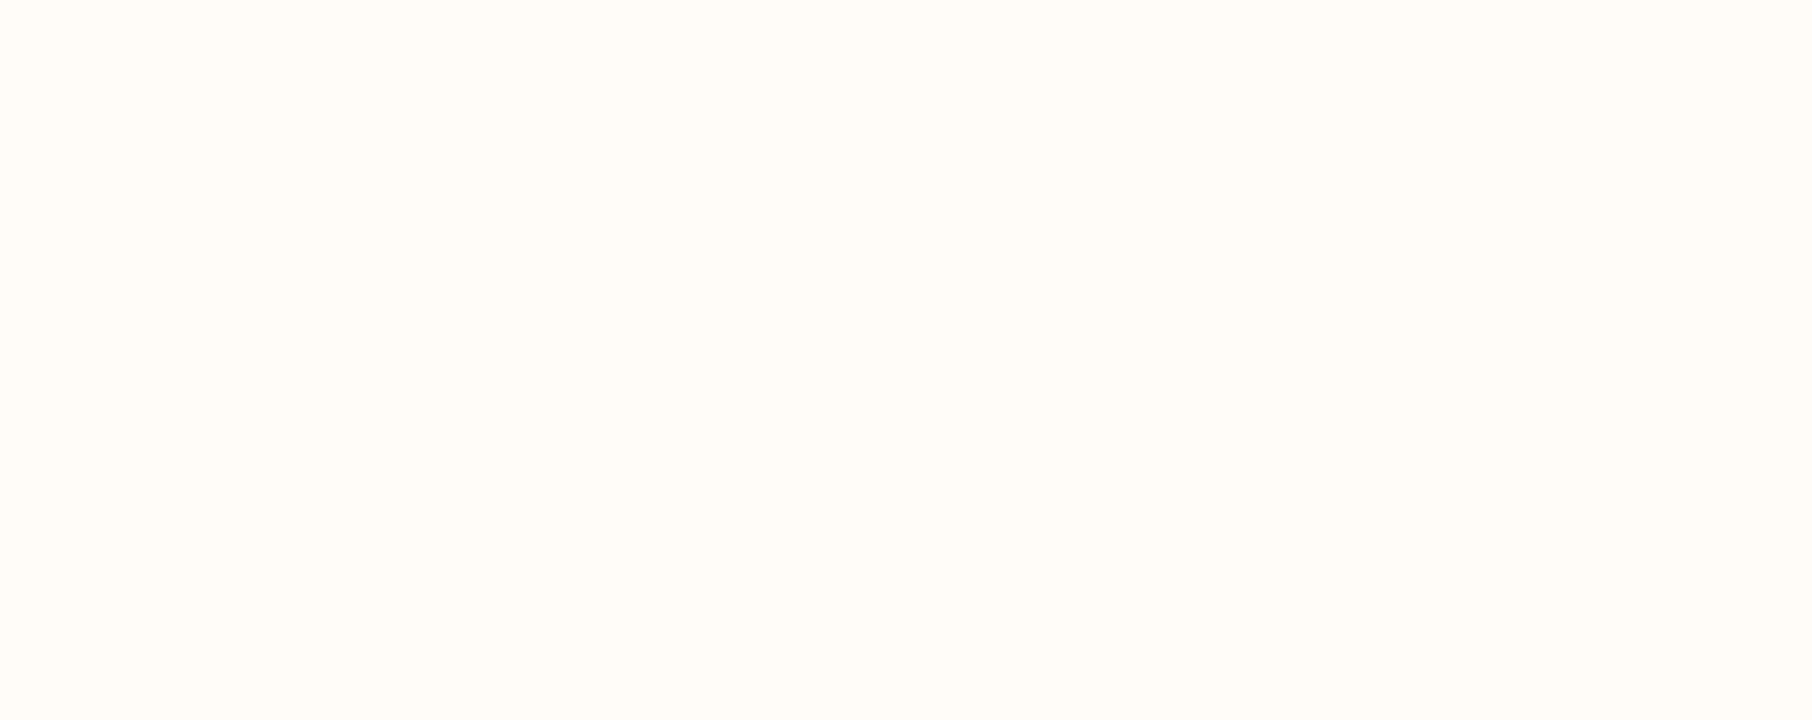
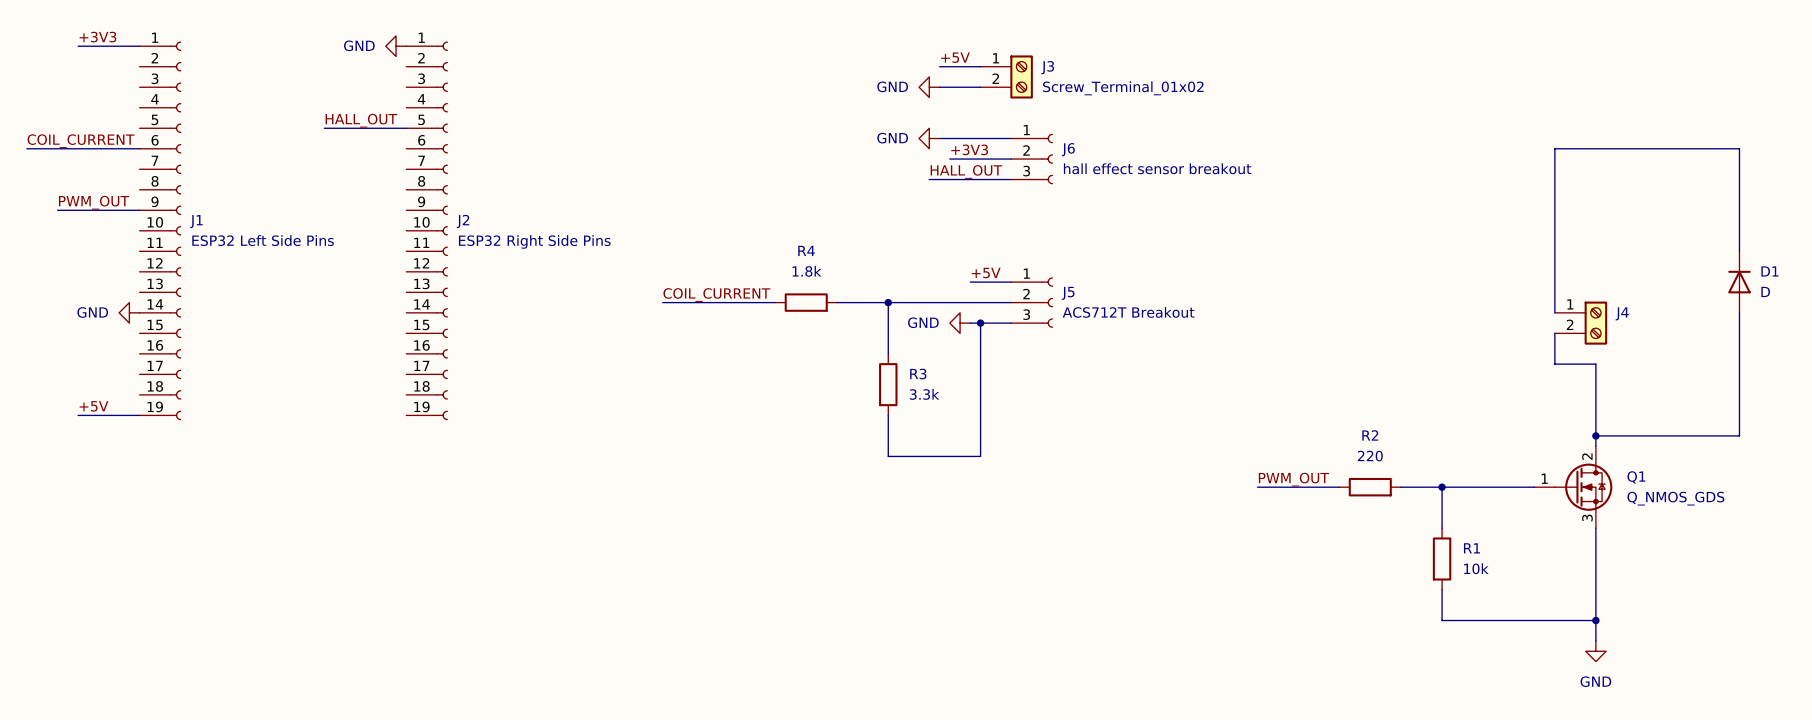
label: none -> +3V3 (97, 37)
wire: none -> (78, 46) (139, 46)
power symbol: none -> GND (396, 46)
label: none -> +5V (955, 57)
wire: none -> (939, 66) (980, 66)
J3: none -> Screw_Terminal_01x02 (1006, 76)
power symbol: none -> GND (929, 87)
wire: none -> (939, 87) (980, 87)
label: none -> HALL_OUT (361, 120)
wire: none -> (324, 128) (406, 128)
power symbol: none -> GND (929, 138)
wire: none -> (939, 138) (1011, 138)
label: none -> COIL_CURRENT (81, 141)
wire: none -> (26, 148) (139, 148)
label: none -> +3V3 (969, 149)
wire: none -> (949, 159) (1011, 159)
J6: none -> hall effect sensor breakout (1032, 159)
label: none -> HALL_OUT (966, 171)
wire: none -> (929, 179) (1011, 179)
label: none -> PWM_OUT (94, 202)
wire: none -> (57, 210) (139, 210)
J1: none -> ESP32 Left Side Pins (160, 230)
J2: none -> ESP32 Right Side Pins (427, 230)
wire: none -> (1739, 251) (1739, 148) (1554, 148) (1554, 312)
label: none -> +5V (986, 273)
wire: none -> (970, 282) (1011, 282)
D1: none -> D (1739, 282)
label: none -> COIL_CURRENT (716, 295)
wire: none -> (662, 302) (775, 302)
R4: none -> 1.8k (806, 302)
wire: none -> (837, 302) (1011, 302)
wire: none -> (888, 302) (888, 353)
junction: none -> (888, 302)
J5: none -> ACS712T Breakout (1032, 302)
power symbol: none -> GND (129, 312)
wire: none -> (1739, 312) (1739, 435) (1595, 435)
power symbol: none -> GND (960, 323)
wire: none -> (970, 323) (1011, 323)
wire: none -> (980, 323) (980, 456) (888, 456) (888, 415)
junction: none -> (980, 323)
J4: none -> (1581, 323)
wire: none -> (1554, 333) (1554, 364) (1595, 364) (1595, 446)
R3: none -> 3.3k (888, 384)
label: none -> +5V (93, 406)
wire: none -> (78, 415) (139, 415)
junction: none -> (1595, 435)
label: none -> PWM_OUT (1293, 479)
wire: none -> (1257, 487) (1339, 487)
R2: none -> 220 (1370, 487)
wire: none -> (1401, 487) (1534, 487)
wire: none -> (1442, 487) (1442, 528)
junction: none -> (1442, 487)
Q1: none -> Q_NMOS_GDS (1573, 487)
wire: none -> (1595, 528) (1595, 641)
R1: none -> 10k (1442, 558)
wire: none -> (1442, 589) (1442, 620) (1595, 620)
junction: none -> (1595, 620)
power symbol: none -> GND (1595, 651)

